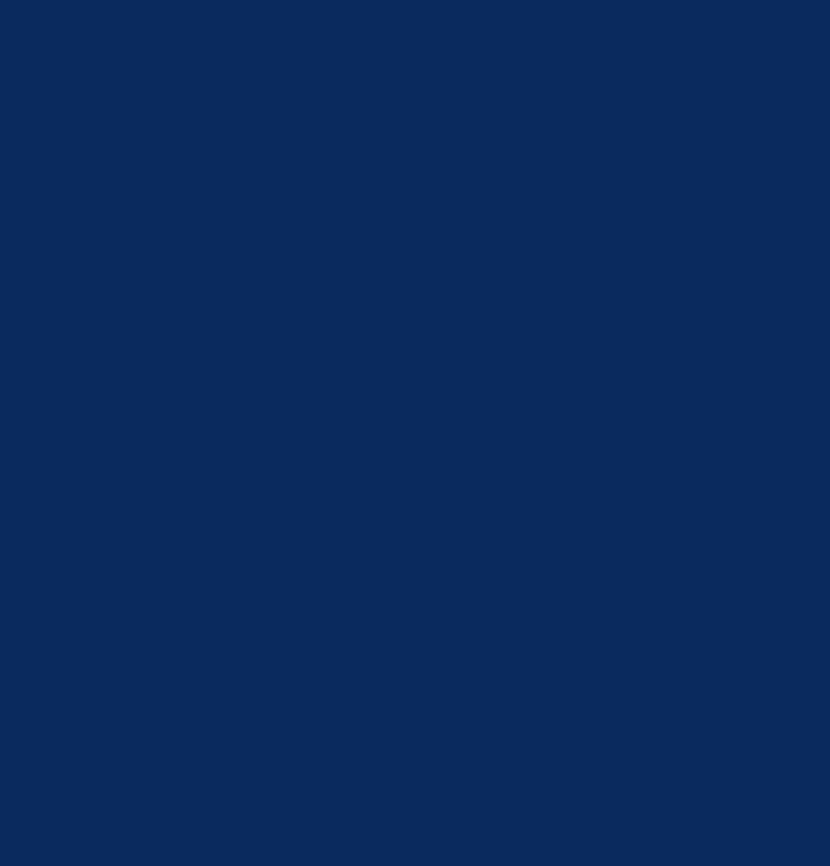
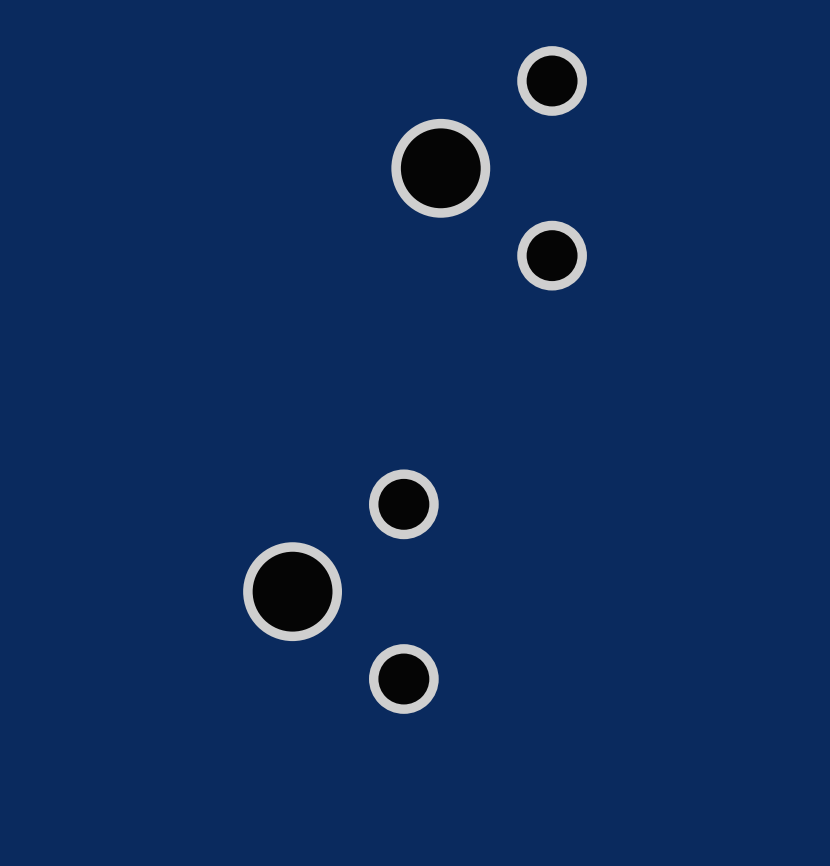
part: none -> (489, 168)
part: none -> (340, 591)

